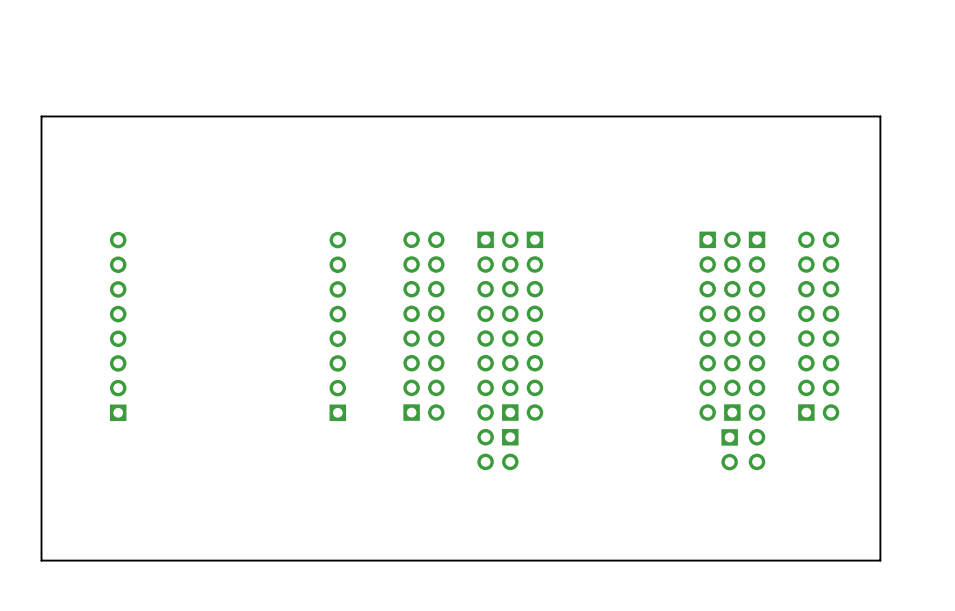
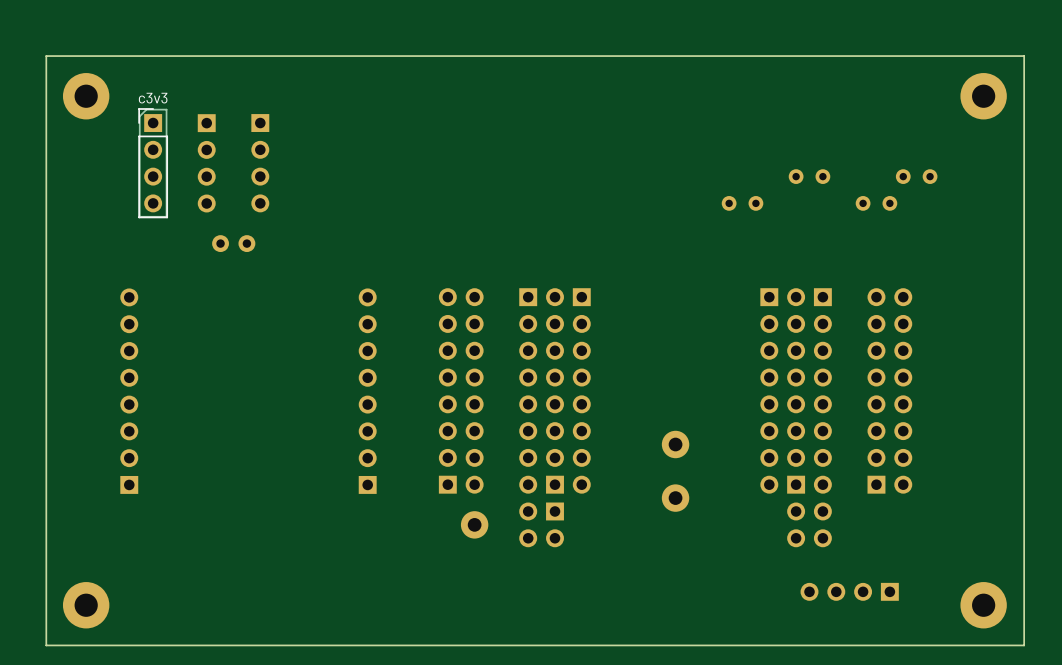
part: none -> (86, 96)
part: none -> (983, 96)
c3v3: none -> (153, 163)
part: none -> (206, 163)
part: none -> (260, 163)
part: none -> (809, 176)
part: none -> (916, 176)
part: none -> (742, 203)
part: none -> (876, 203)
part: none -> (233, 243)
part: none -> (675, 444)
part: none -> (675, 498)
part footprint: [721, 429, 738, 471] -> [787, 502, 806, 548]
part: none -> (474, 524)
part: none -> (849, 591)
part: none -> (86, 605)
part: none -> (983, 605)
board edge: (880, 560) (880, 116) (41, 116) (41, 560) -> (956, 645) (1024, 645) (1024, 56) (46, 56) (46, 645)

